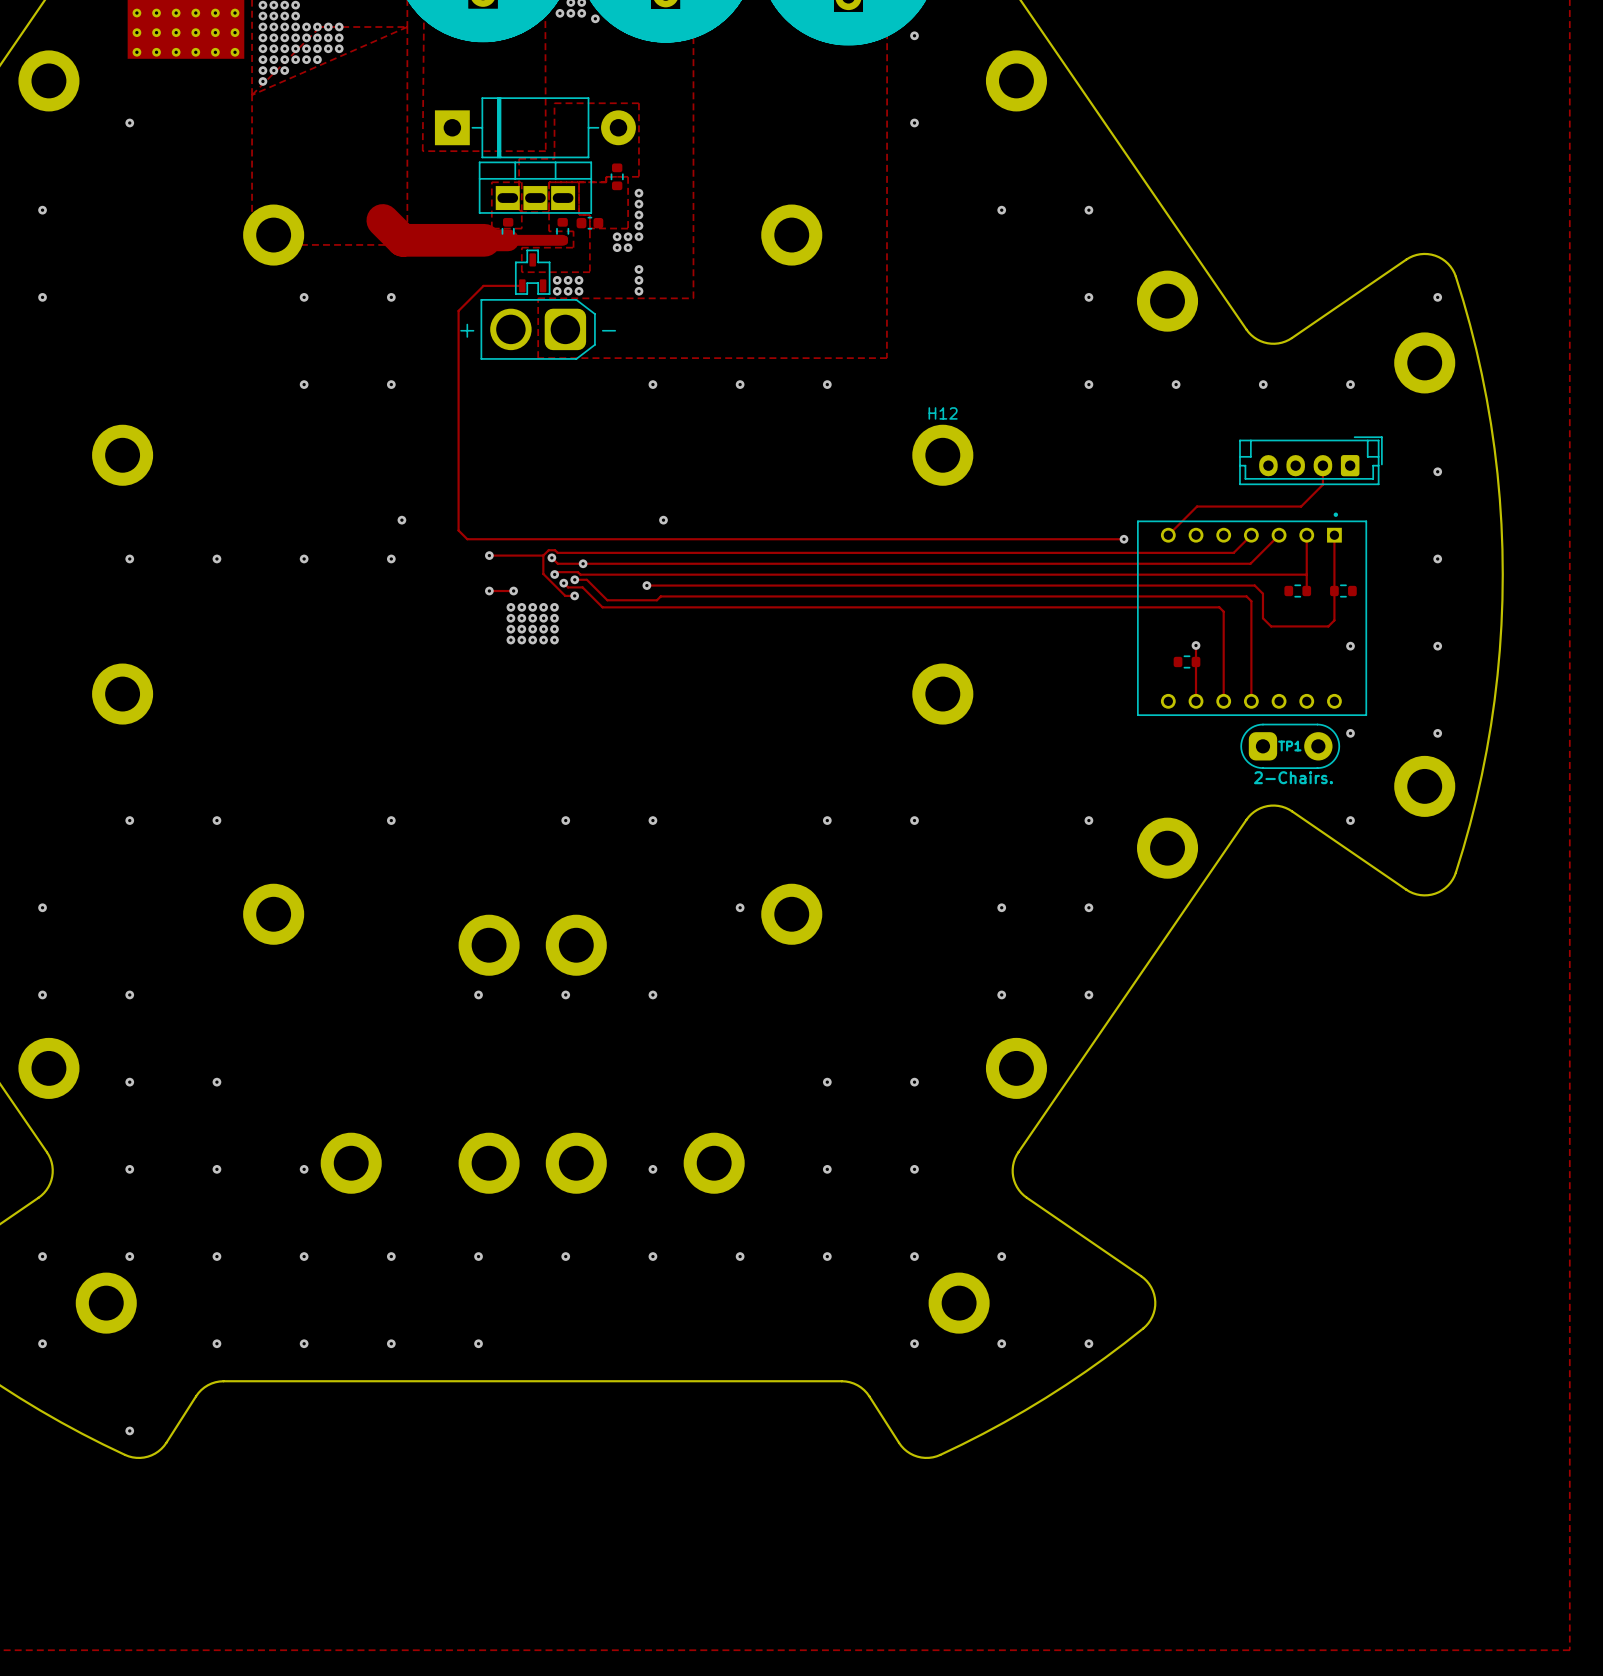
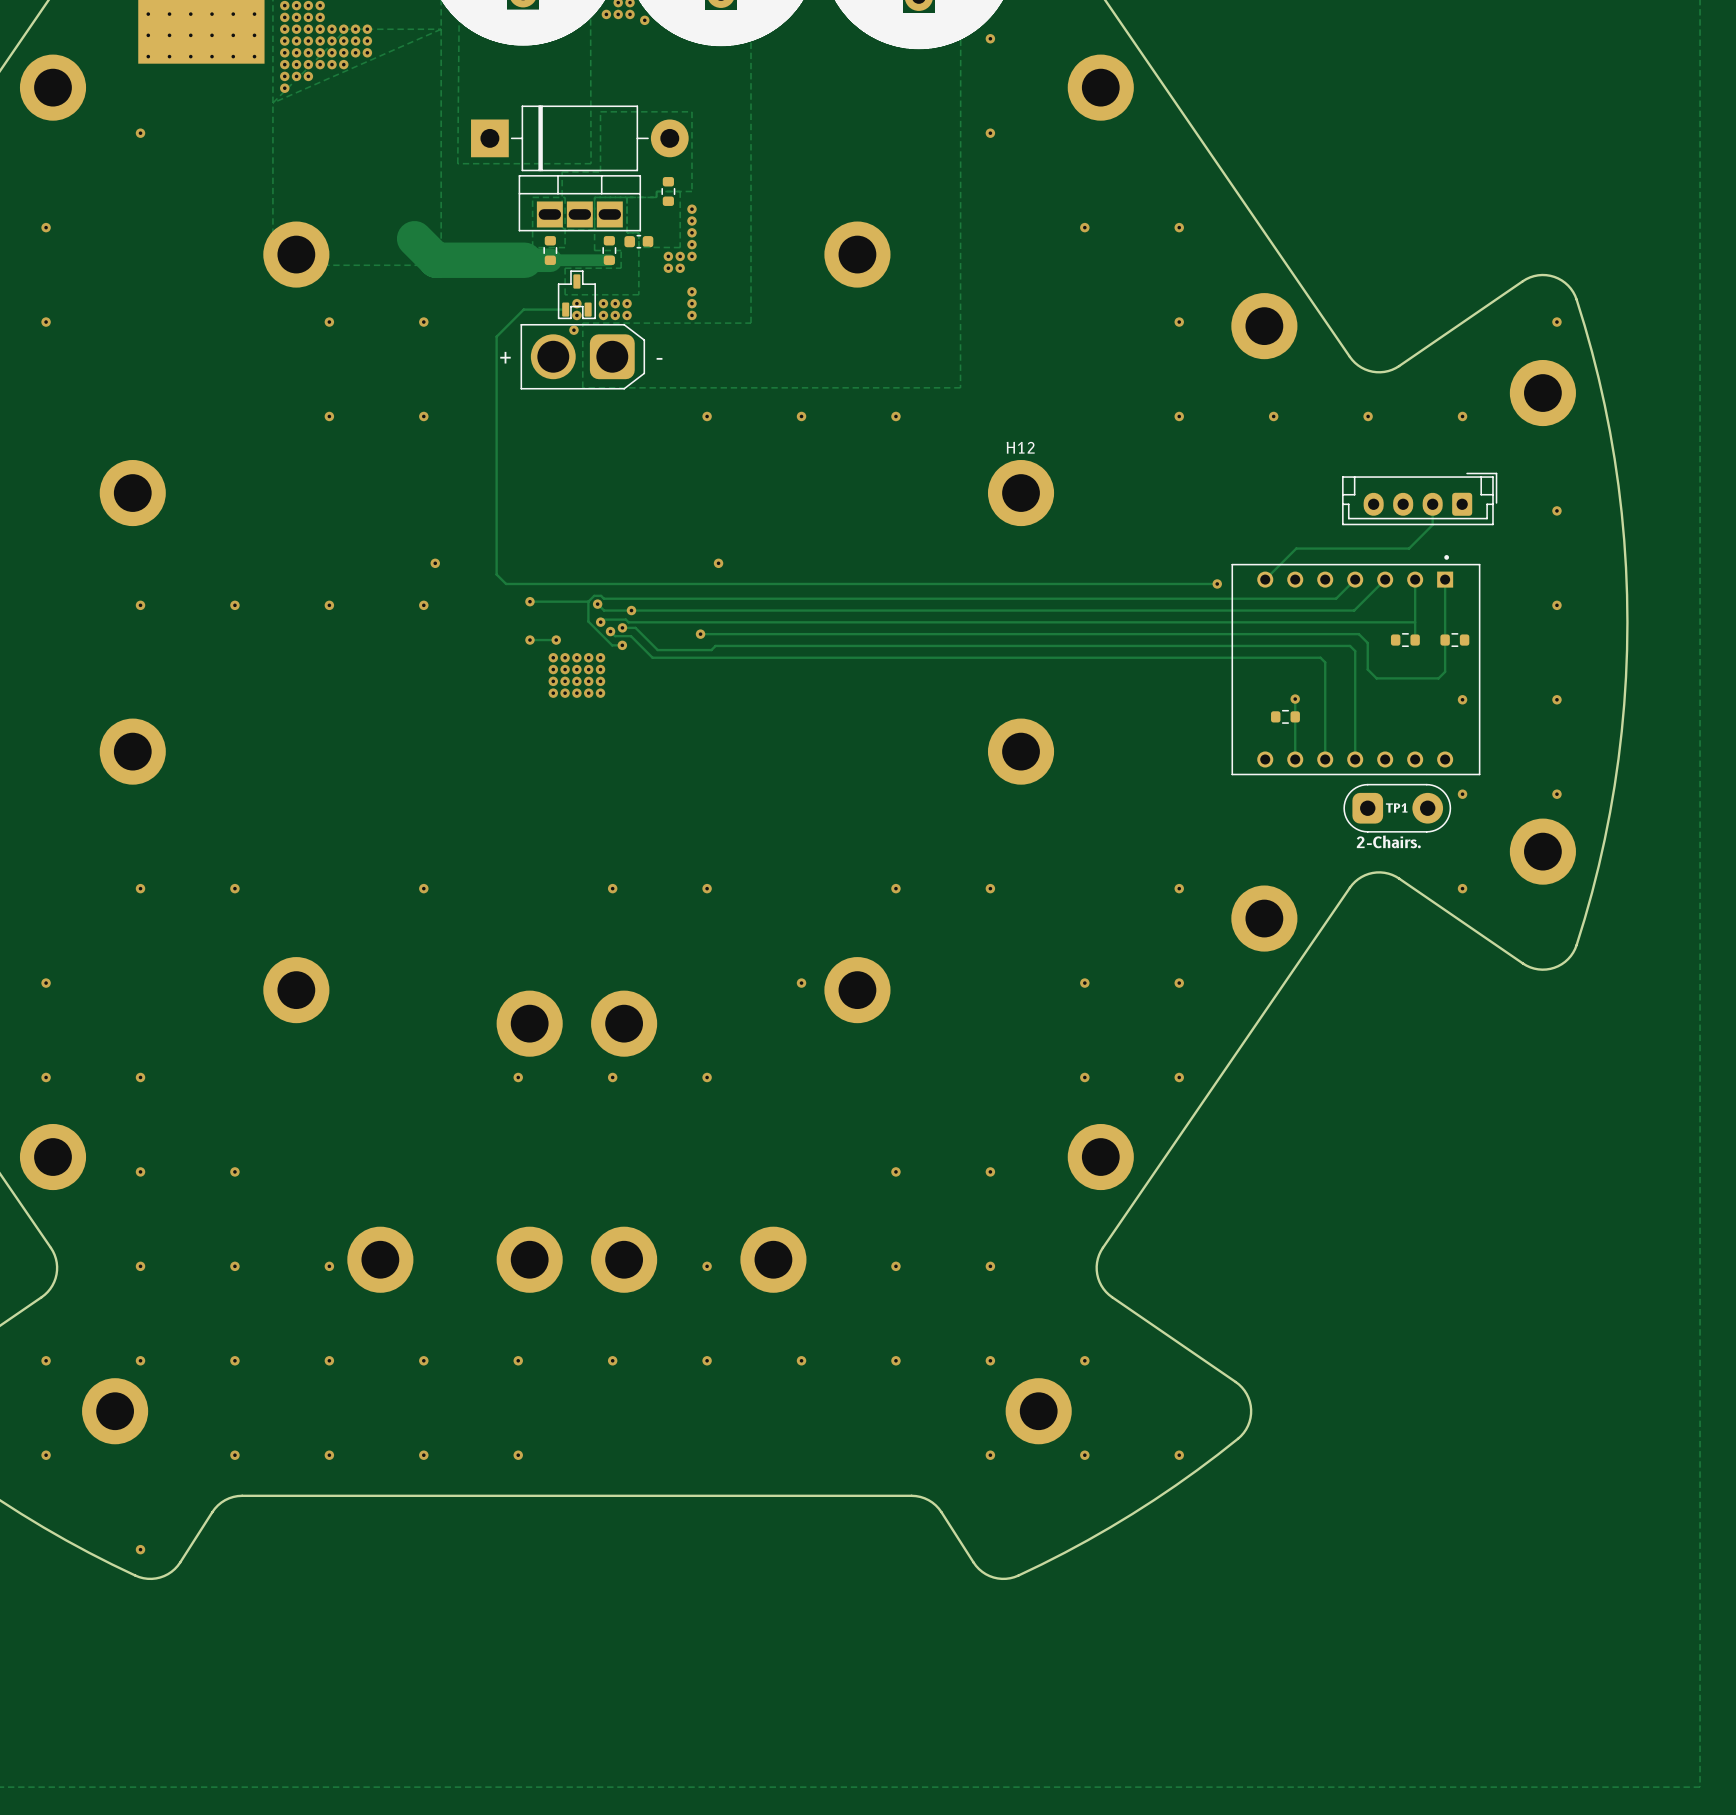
via: none -> (576, 303)
via: none -> (576, 315)
via: none -> (573, 330)

